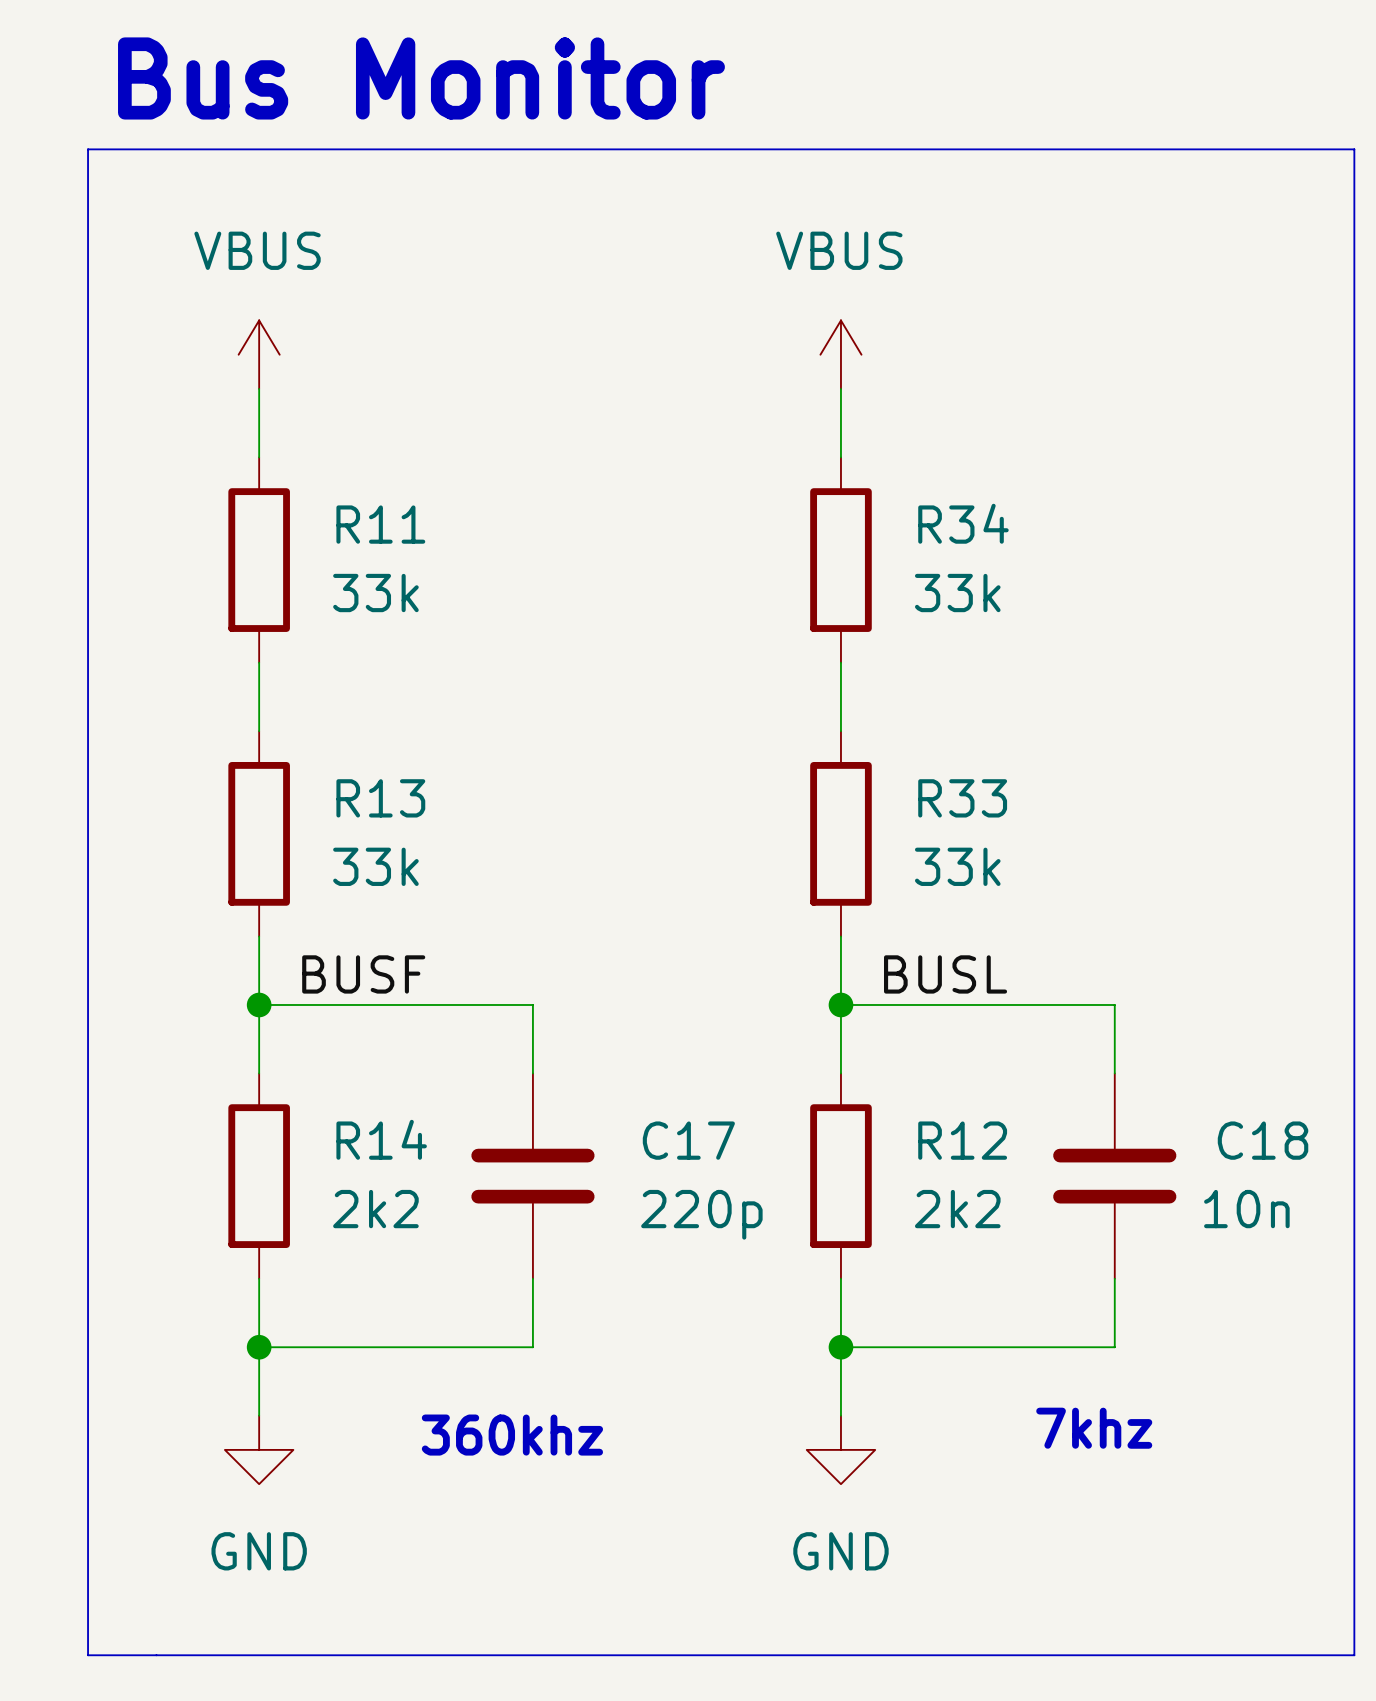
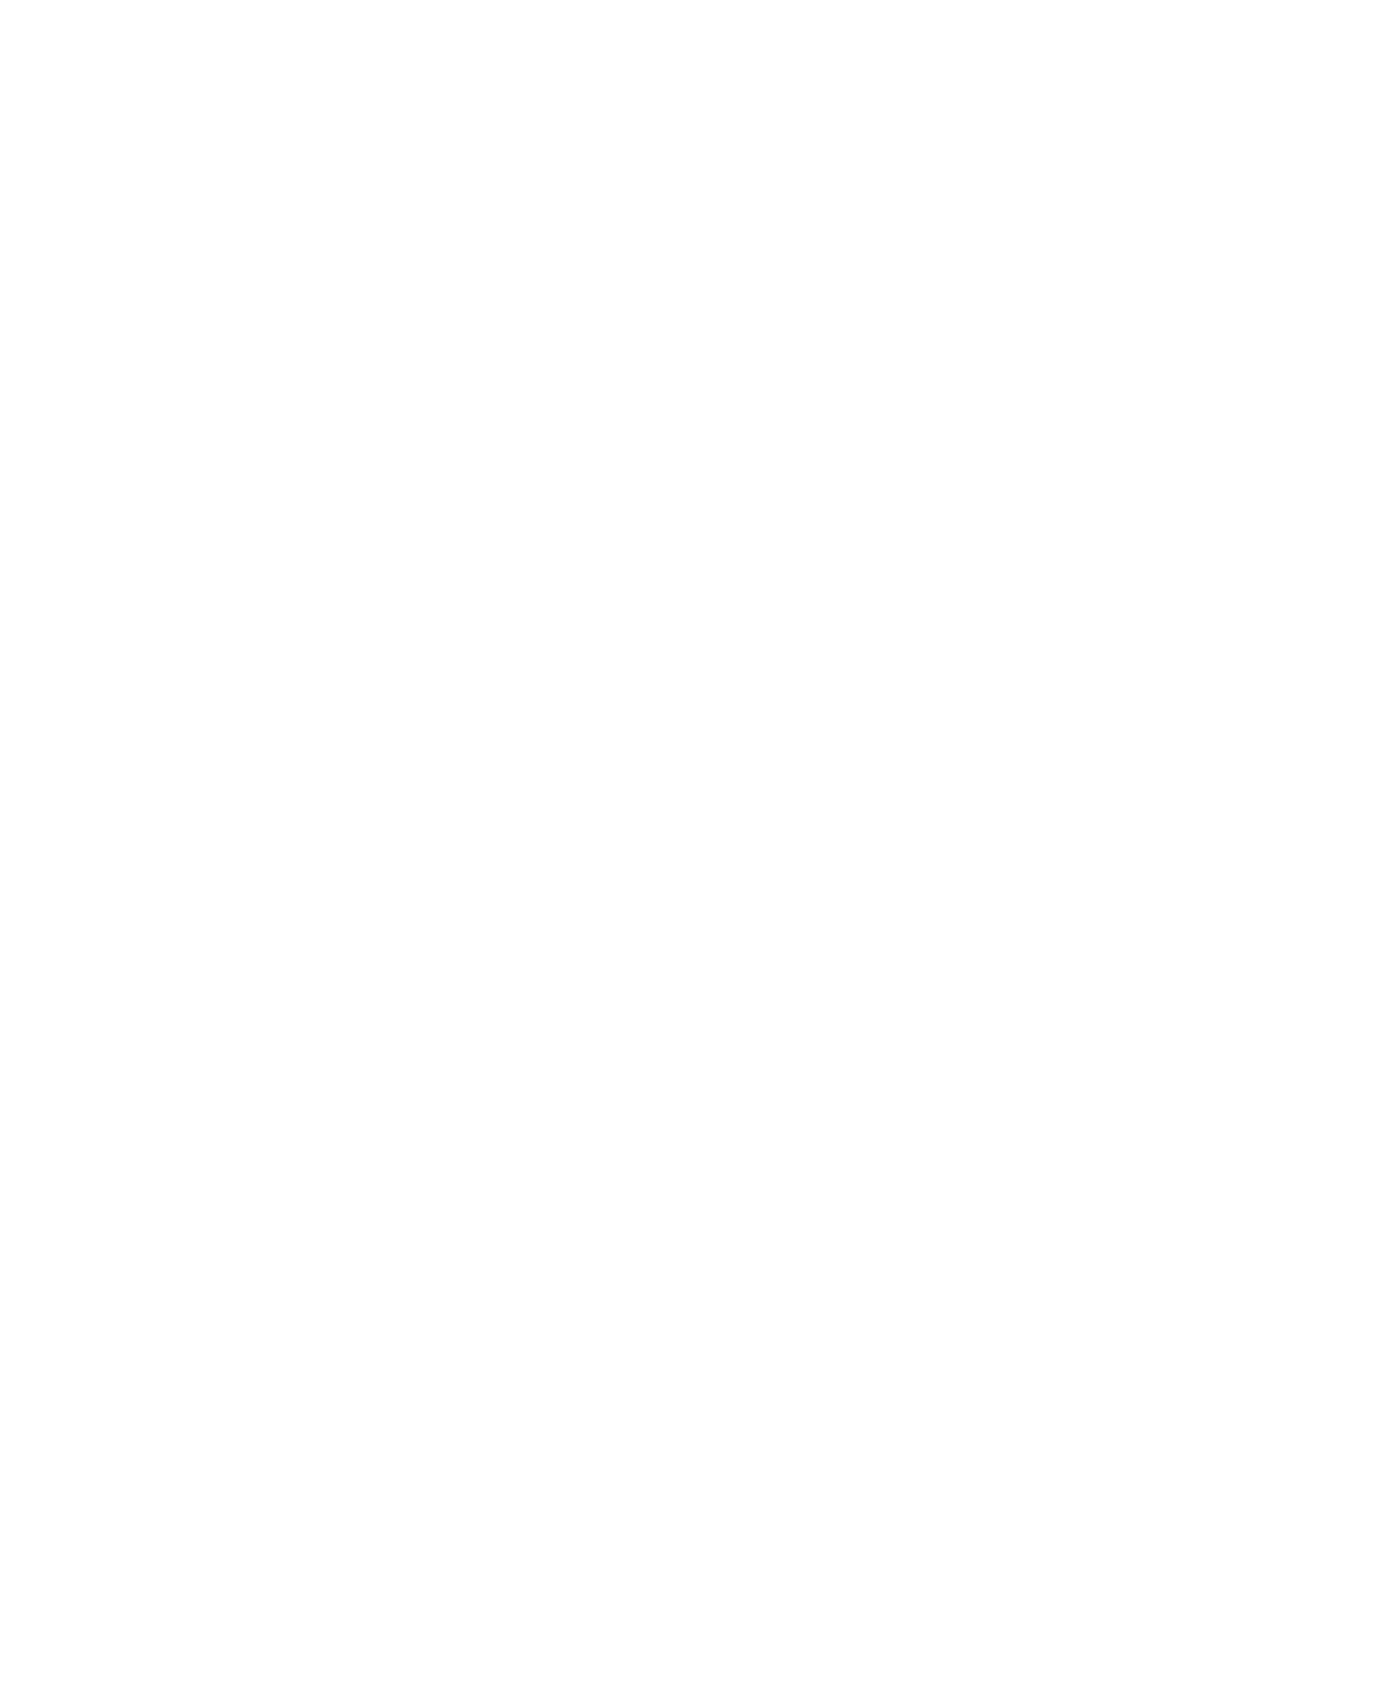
text: Bus Monitor (421, 78) -> none
line: (88, 149) (88, 1655) (1354, 1655) (1354, 149) (88, 149) -> none
power symbol: VBUS (259, 354) -> none
power symbol: VBUS (840, 354) -> none
wire: (259, 388) (259, 457) -> none
wire: (840, 388) (840, 457) -> none
R11: 33k (259, 560) -> none
R34: 33k (840, 560) -> none
wire: (259, 662) (259, 731) -> none
wire: (840, 662) (840, 731) -> none
R13: 33k (259, 833) -> none
R33: 33k (840, 833) -> none
wire: (259, 936) (259, 1073) -> none
wire: (840, 936) (840, 1073) -> none
label: BUSF (363, 974) -> none
label: BUSL (945, 974) -> none
wire: (259, 1004) (532, 1004) (532, 1073) -> none
junction: (259, 1004) -> none
wire: (840, 1004) (1114, 1004) (1114, 1073) -> none
junction: (840, 1004) -> none
R14: 2k2 (259, 1176) -> none
C17: 220p (532, 1176) -> none
R12: 2k2 (840, 1176) -> none
C18: 10n (1114, 1176) -> none
wire: (259, 1278) (259, 1415) -> none
wire: (532, 1278) (532, 1347) (259, 1347) -> none
wire: (840, 1278) (840, 1415) -> none
wire: (1114, 1278) (1114, 1347) (840, 1347) -> none
junction: (259, 1347) -> none
junction: (840, 1347) -> none
text: 7khz (1094, 1428) -> none
text: 360khz (512, 1435) -> none
power symbol: GND (259, 1449) -> none
power symbol: GND (840, 1449) -> none

